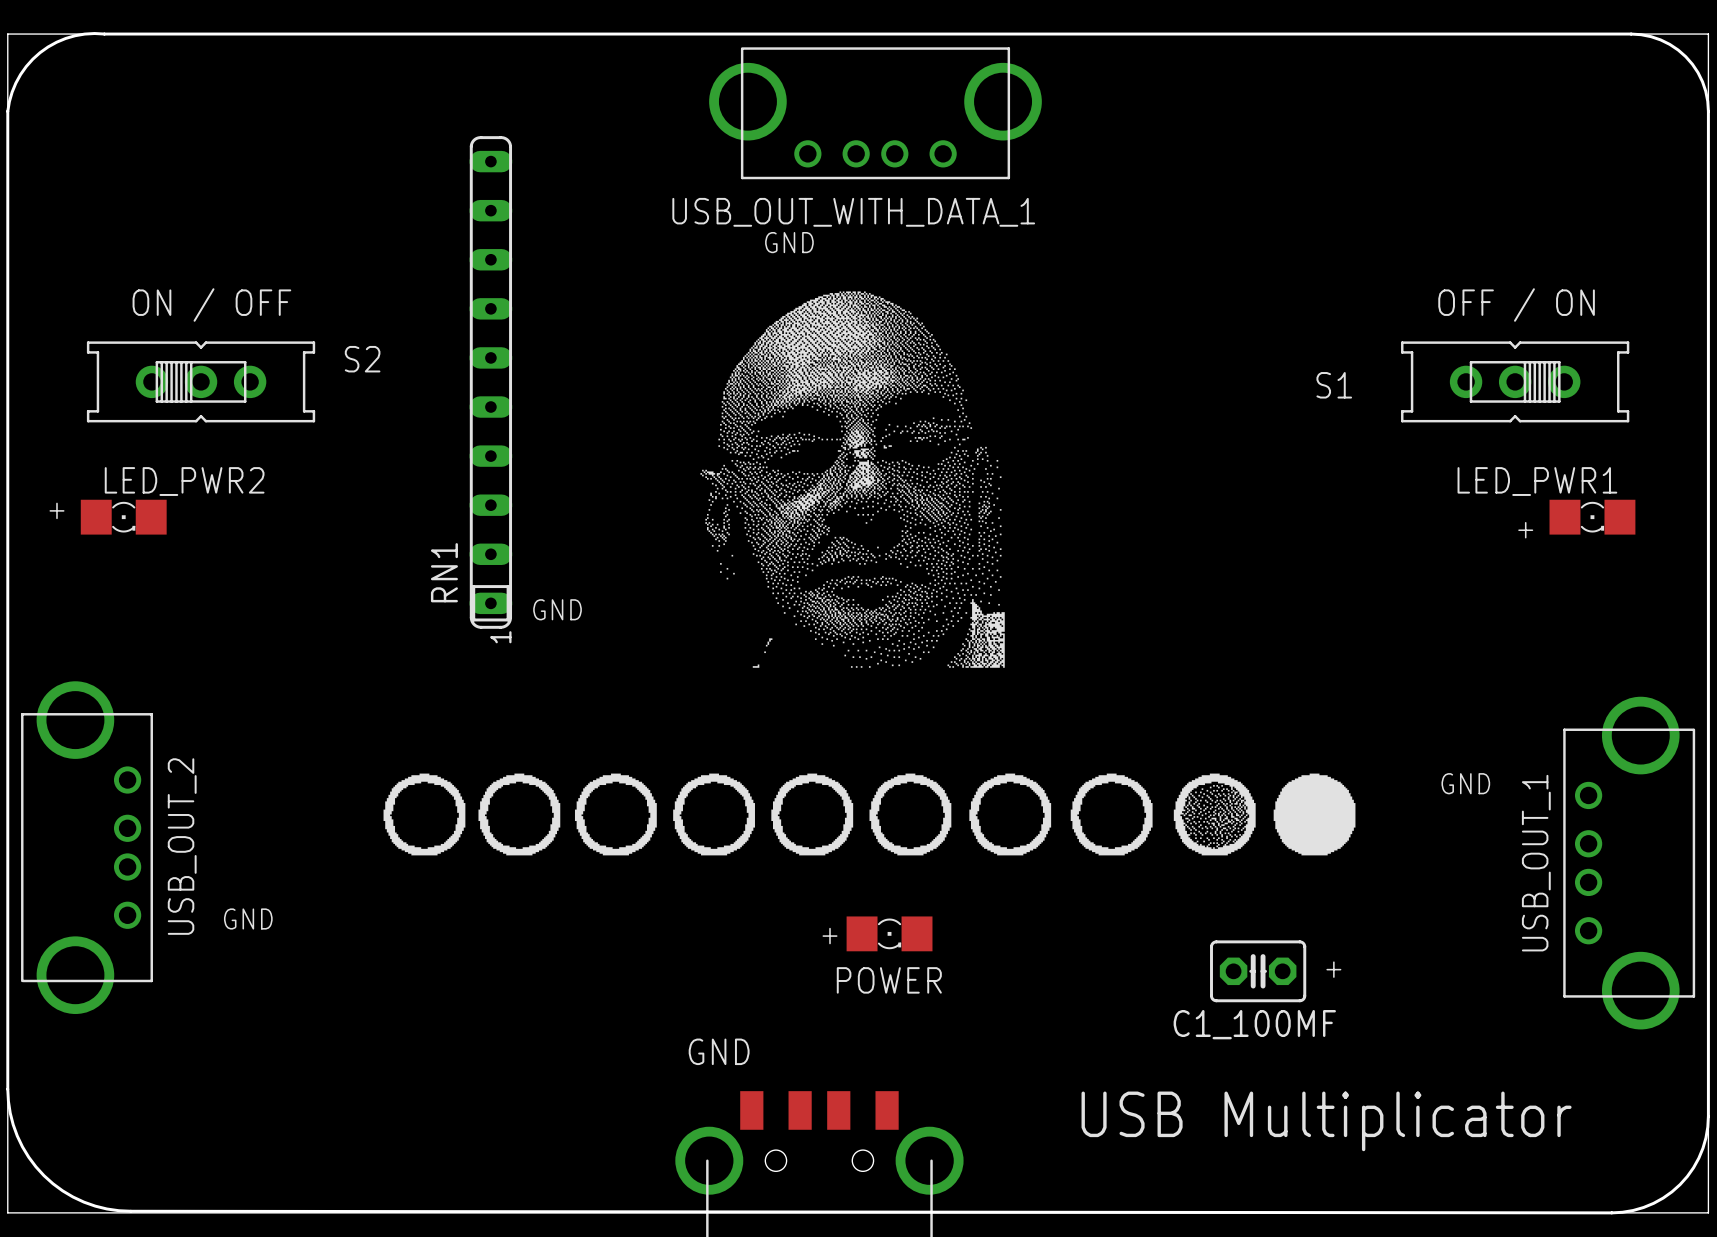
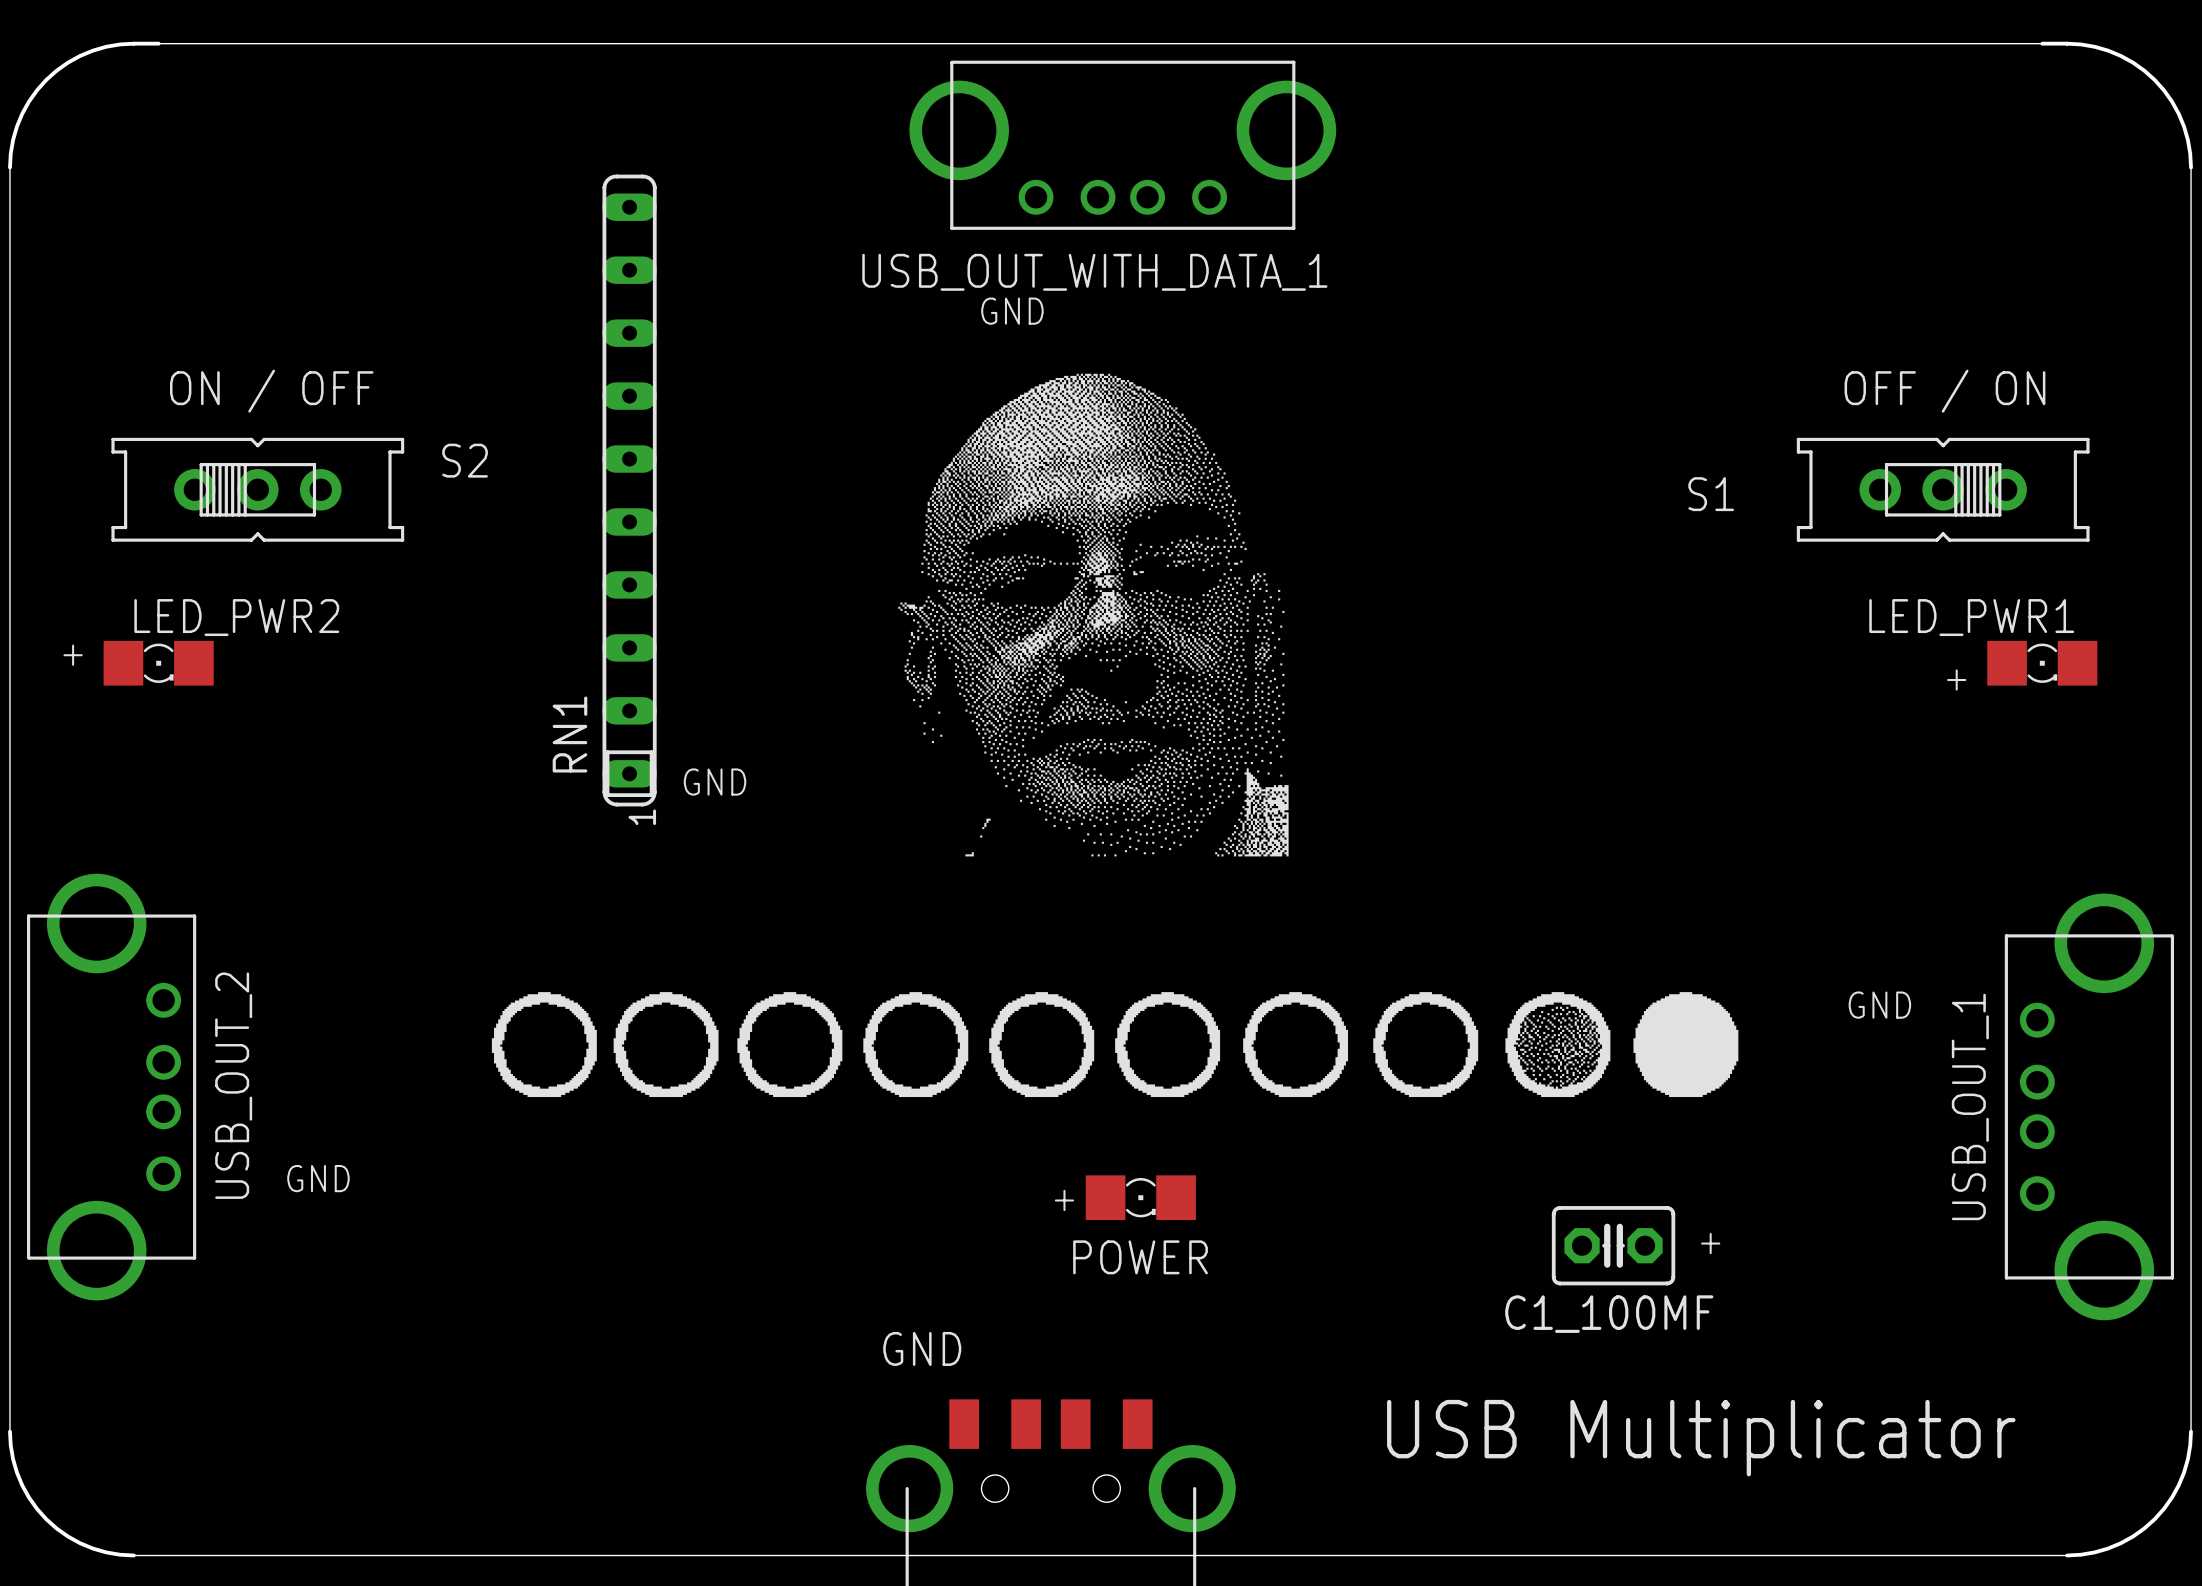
board edge: (104, 34) (84, 34) (65, 38) (40, 52) (20, 74) (12, 92) (7, 111) (7, 1089) (13, 1124) (22, 1146) (35, 1166) (62, 1190) (95, 1206) (130, 1211) (1708, 1212) (1707, 101) (1698, 72) (1678, 50) (1651, 36) (1611, 34) -> (133, 43) (120, 44) (92, 50) (67, 62) (46, 79) (28, 101) (16, 126) (10, 153) (9, 167)
board edge: (7, 130) (7, 34) (1708, 34) (1708, 130) -> (2067, 43) (2080, 44) (2108, 50) (2133, 62) (2154, 79) (2172, 101) (2184, 126) (2190, 153) (2191, 167)
board edge: (7, 1116) (7, 1212) (104, 1212) -> (9, 1431) (10, 1445) (16, 1472) (28, 1497) (46, 1519) (67, 1536) (92, 1548) (120, 1554) (133, 1555)

